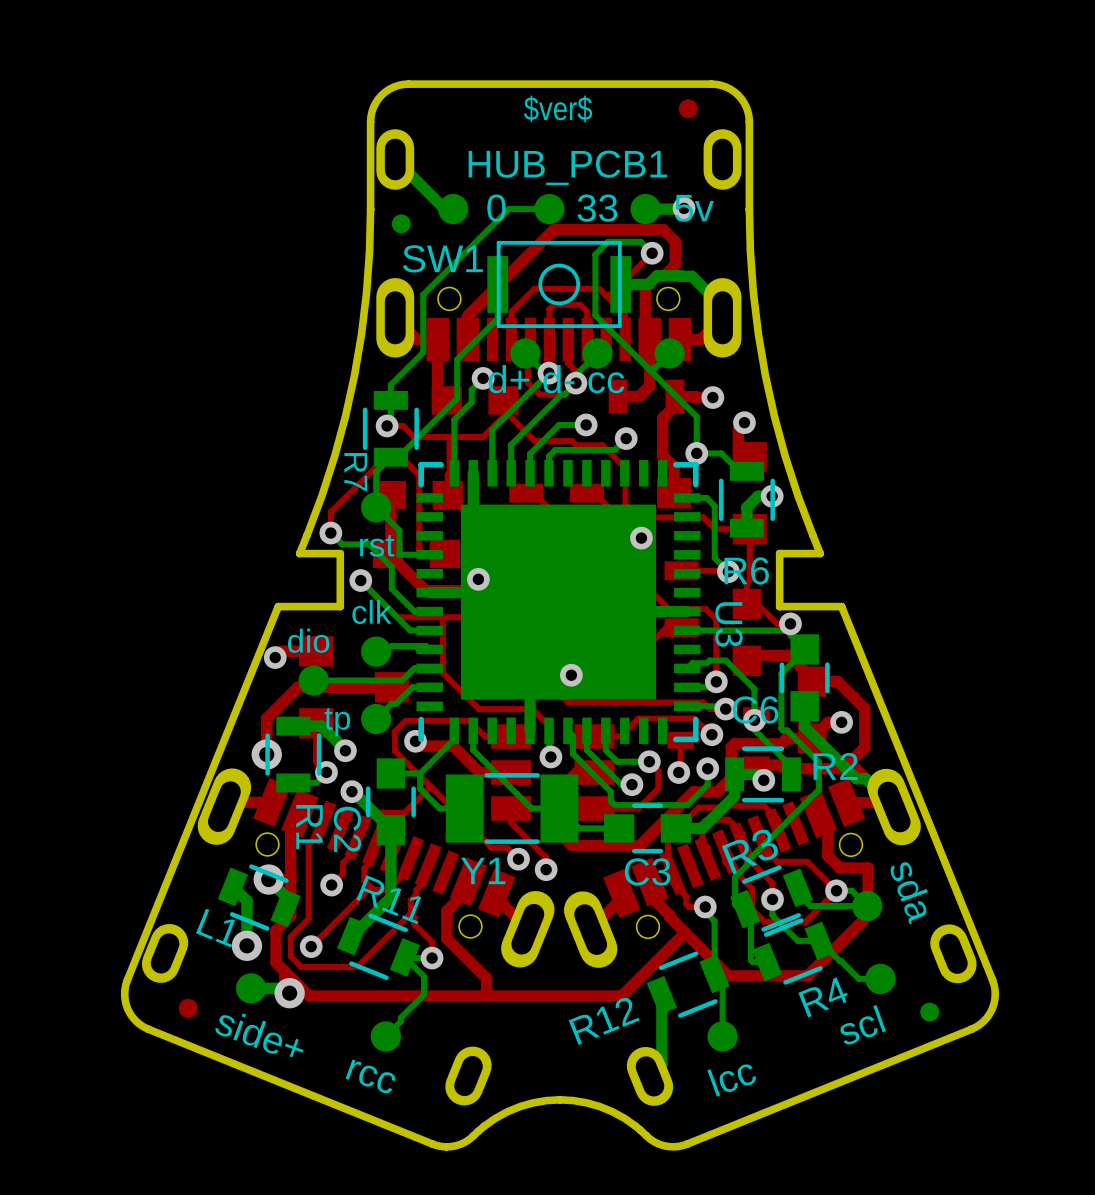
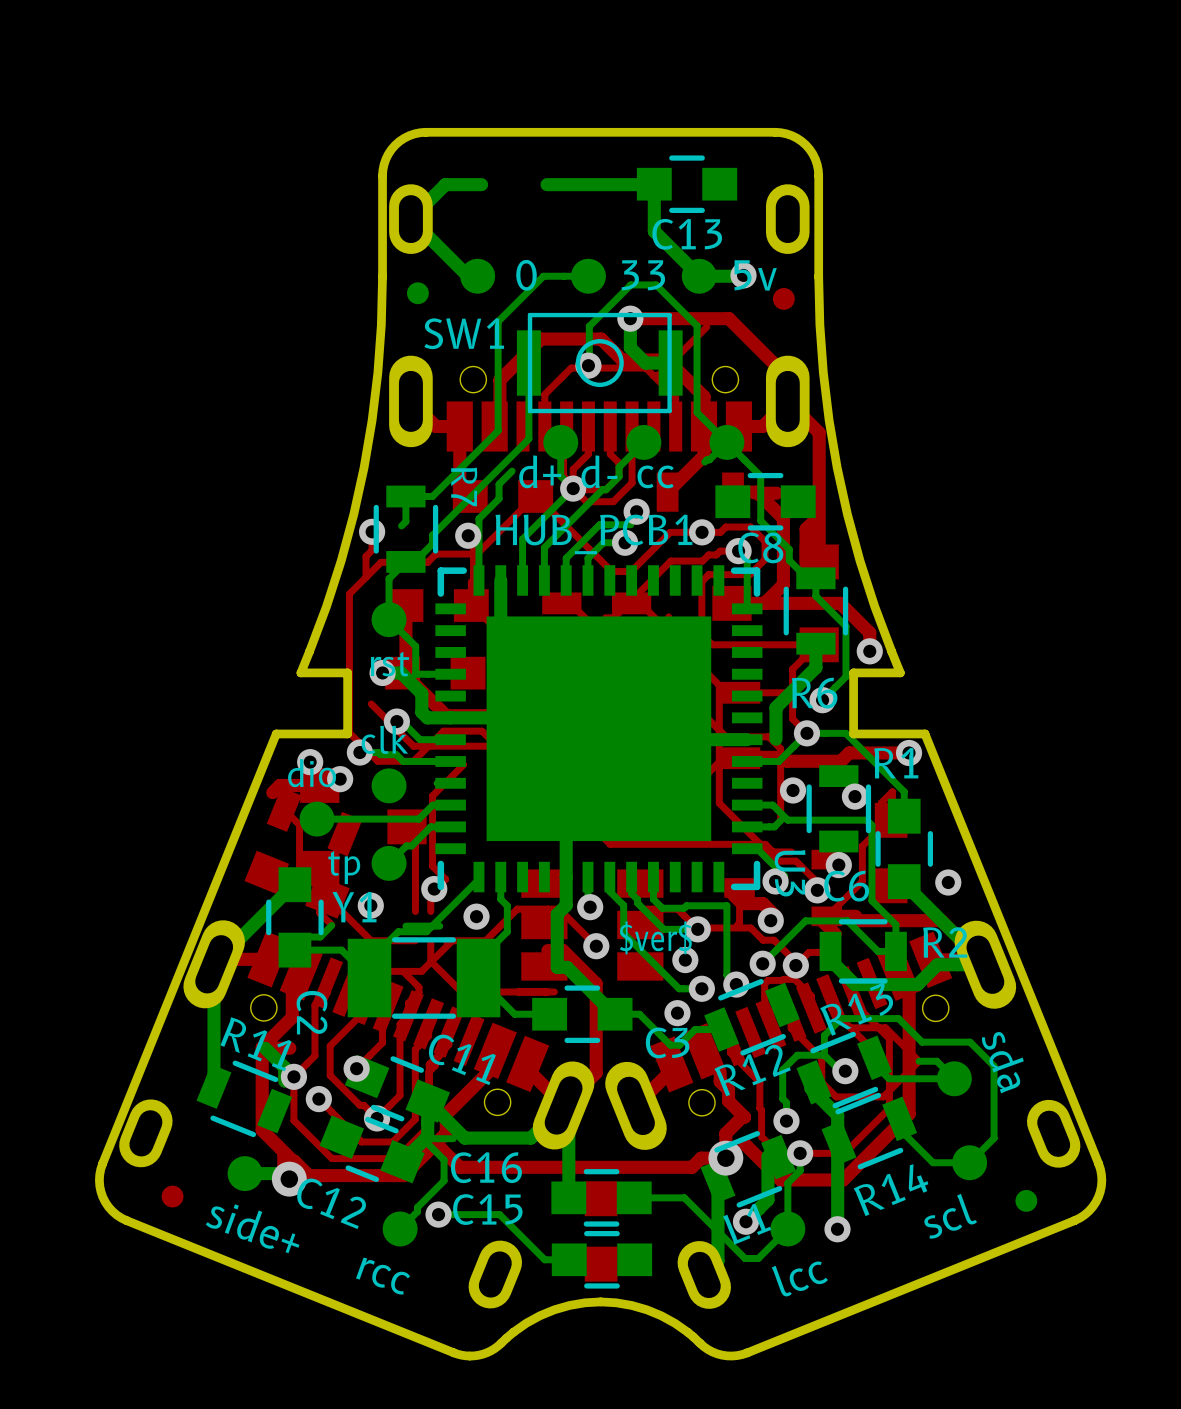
text position: $ver$ (558, 108) -> $ver$ (655, 937)
part position: (688, 108) -> (783, 298)
bottom track: none -> (481, 184) (445, 184) (410, 219)
bottom track: none -> (654, 184) (654, 231) (699, 276)
bottom track: none -> (653, 184) (547, 184)
C13: none -> (687, 184)
text position: HUB_PCB1 (567, 167) -> HUB_PCB1 (593, 534)
bottom track: (510, 209) (423, 294) (423, 352) (390, 384) (390, 400) -> (543, 276) (498, 321) (498, 430) (432, 496) (405, 496)
top track: none -> (630, 318) (729, 318) (787, 377) (787, 401) (819, 432) (819, 561)
via: none -> (630, 318)
bottom track: (652, 253) (640, 241) (608, 241) (595, 254) (595, 315) (696, 416) (696, 453) (721, 453) (723, 455) -> (588, 365) (589, 326) (630, 284) (656, 284) (697, 325) (697, 412) (760, 476) (760, 520) (789, 549) (789, 560)
via: (652, 253) -> none
bottom track: (620, 284) (648, 284) (657, 275) (692, 276) (722, 306) (722, 317) -> (670, 363) (645, 363) (630, 347) (630, 318)
via: none -> (588, 365)
bottom track: (497, 318) (457, 359) (457, 398) (413, 441) -> (528, 402) (528, 438) (432, 535) (432, 544)
top track: (587, 339) (587, 311) (580, 304) (553, 304) (549, 309) (549, 339) -> (632, 426) (632, 482) (613, 501) (586, 501) (573, 488) (573, 469) (588, 454)
top track: (649, 339) (645, 335) (645, 287) (657, 275) (664, 275) (675, 264) (675, 241) (663, 229) (554, 229) (467, 315) (467, 339) -> (704, 426) (704, 396) (667, 359) (622, 359) (601, 339) (540, 339) (499, 380) (499, 421) (494, 426)
bottom track: (525, 353) (545, 373) (548, 373) (492, 429) (492, 437) -> (560, 442) (560, 476) (573, 488) (522, 539)
top track: (649, 364) (649, 385) (638, 396) (618, 396) -> (704, 455) (667, 492)
via position: (548, 373) -> (573, 488)
via: (483, 378) -> none
via: (575, 383) -> none
top track: none -> (758, 493) (783, 518) (783, 584) (764, 603)
via: (712, 397) -> none
top track: (669, 411) (662, 418) (662, 455) (674, 466) (674, 493) -> (869, 651) (869, 632) (840, 603) (731, 603)
top track: (507, 413) (534, 441) (572, 441) (576, 445) (602, 445) (625, 468) (625, 504) (638, 517) (703, 517) (715, 529) -> (533, 745) (495, 745) (482, 731) (443, 731) (413, 761) (377, 761) (349, 732) (349, 593) (381, 562) (427, 562) (436, 554) (477, 554) (534, 496) (536, 496) (611, 571) (631, 571) (670, 532) (720, 532) (725, 527) (750, 527) (765, 541) (765, 559) (749, 574) (708, 574) (701, 581) (701, 634) (712, 644) (779, 644)
top track: (507, 413) (483, 436) (414, 436) (403, 425) (387, 425) -> none
via: none -> (636, 511)
via: (744, 422) -> none
via: (586, 424) -> none
via position: (387, 425) -> (372, 531)
top track: none -> (372, 531) (372, 550) (366, 556) (366, 577)
via: none -> (468, 535)
bottom track: (626, 438) (614, 449) (555, 449) (549, 456) -> (625, 542) (603, 542) (588, 558) (588, 560)
via position: (626, 438) -> (702, 532)
via: none -> (625, 542)
top track: none -> (738, 551) (720, 551) (716, 554) (708, 554) (702, 561) (670, 561) (614, 617) (605, 617)
via position: (696, 453) -> (738, 551)
R7 name position: R7 (355, 471) -> R7 (464, 486)
bottom track: none -> (815, 578) (815, 596) (846, 626) (846, 676) (822, 700)
bottom track: (772, 496) (758, 496) (746, 507) (746, 528) -> (776, 739) (776, 707) (815, 667) (815, 643)
via: (772, 496) -> none
bottom track: (687, 497) (706, 497) (714, 506) (714, 558) (728, 571) -> (747, 608) (747, 559) (738, 551)
top track: none -> (668, 616) (668, 634) (719, 685) (719, 803) (777, 861) (796, 861) (817, 882) (817, 890)
top track: none -> (817, 644) (792, 669) (792, 718) (806, 733)
bottom track: (330, 533) (342, 544) (369, 544) (391, 567) (391, 588) (414, 611) -> (396, 721) (402, 721) (420, 739) (433, 739)
top track: (330, 533) (330, 512) (380, 462) (406, 462) (419, 475) (419, 549) (423, 553) (444, 553) -> none
via: (330, 533) -> none
via: none -> (869, 651)
via: (641, 538) -> none
top track: (738, 540) (749, 529) (749, 579) (746, 582) (746, 603) (757, 603) (777, 623) (790, 623) -> none
bottom track: none -> (382, 672) (401, 672) (421, 693) (421, 712) (427, 717) (450, 717)
via: none -> (382, 672)
via: (728, 571) -> none
via: none -> (822, 700)
via: (478, 579) -> none
bottom track: (360, 580) (410, 630) -> (359, 752) (396, 754) (403, 761) (428, 761)
via position: (360, 580) -> (396, 721)
via: none -> (806, 733)
top track: (442, 617) (442, 673) (478, 709) (532, 709) (550, 727) (550, 757) -> none
via: none -> (359, 752)
via: (790, 623) -> none
top track: none -> (909, 752) (849, 752) (840, 761) (787, 761) (783, 757) (753, 757)
via: none -> (909, 752)
U3 name position: U3 (728, 624) -> U3 (790, 873)
bottom track: (714, 630) (783, 630) (790, 623) (790, 635) (804, 649) (781, 673) (781, 728) (787, 730) (818, 762) (818, 789) (747, 860) (747, 864) (735, 877) (735, 904) (750, 920) (750, 960) (752, 962) (766, 962) -> (778, 761) (806, 733) (845, 733) (904, 791) (904, 816)
via: none -> (310, 762)
C8 side: top (746, 632) -> bottom (765, 501)
top track: none -> (463, 764) (432, 795) (432, 866) (445, 879) (430, 892) (430, 911)
via: none -> (340, 779)
bottom track: (429, 649) (426, 646) (391, 646) (376, 661) -> none
via: none -> (793, 790)
via: (275, 657) -> none
top track: (746, 660) (752, 655) (789, 655) (812, 678) (812, 681) (837, 681) (864, 708) (864, 747) (843, 768) -> none
via: none -> (854, 796)
top track: none -> (881, 803) (892, 791) (892, 816) (862, 846) (862, 881) (823, 920) (817, 920)
bottom track: (687, 668) (692, 663) (725, 660) (754, 689) (754, 729) (791, 766) (791, 774) -> (747, 805) (772, 805) (787, 820) (866, 820) (871, 825) (871, 900) (895, 924) (895, 951) (878, 951) (847, 920) (805, 920) (762, 963)
top track: none -> (284, 809) (299, 824) (299, 869) (371, 940) (415, 940)
via: (571, 675) -> none
C6 position: (804, 677) -> (904, 848)
via: (716, 681) -> none
part: none -> (314, 821)
top track: none -> (395, 823) (413, 823) (415, 825) (415, 911)
top track: (391, 687) (297, 687) (266, 718) (266, 754) -> none
bottom track: (695, 706) (722, 706) (725, 709) -> (757, 848) (784, 876) (784, 884)
bottom track: (804, 706) (804, 727) (856, 778) (865, 778) -> (904, 881) (952, 932)
via: (725, 709) -> none
via: (754, 720) -> none
via: none -> (838, 865)
top track: (841, 722) (828, 722) (812, 738) (786, 738) (781, 743) (734, 743) (731, 747) (731, 777) (717, 791) (693, 791) (640, 845) (571, 845) (557, 831) (557, 791) (576, 772) (594, 772) -> none
via position: (841, 722) -> (948, 882)
bottom track: (293, 726) (321, 726) (345, 750) -> none
bottom track: none -> (566, 877) (566, 905) (557, 914) (557, 967) (567, 967) (613, 1014) (639, 1014) (670, 1045) (679, 1045) (695, 1029) (721, 1029)
bottom track: (567, 730) (573, 735) (573, 753) (610, 791) (610, 801) (614, 805) (687, 805) (707, 784) (707, 768) -> (609, 877) (609, 891) (623, 905) (623, 933) (679, 988) (701, 988)
bottom track: (454, 732) (454, 739) (420, 773) (420, 789) (439, 808) (464, 808) -> (478, 879) (426, 931) (398, 931) (369, 960) (369, 978) (341, 950) (294, 950)
top track: (711, 734) (693, 718) (638, 718) (620, 736) (594, 736) -> none
top track: (511, 736) (485, 736) (469, 720) (405, 720) (395, 731) (395, 751) (491, 847) (507, 847) (518, 859) -> none
bottom track: none -> (294, 884) (213, 964) (213, 1086)
part: none -> (297, 884)
top track: (415, 741) (420, 746) (453, 746) (479, 772) (511, 772) -> none
via: none -> (817, 890)
top track: none -> (730, 892) (742, 903) (762, 903) (776, 916)
bottom track: (586, 745) (586, 750) (621, 784) (631, 784) -> (631, 893) (637, 899) (637, 903) (663, 929) (697, 929)
via position: (345, 750) -> (370, 905)
via: (266, 754) -> none
R1 position: (293, 754) -> (838, 808)
bottom track: (478, 755) (531, 808) (559, 808) (579, 828) (619, 828) -> (507, 905) (507, 931) (478, 960) (478, 978) (514, 1014) (549, 1014)
bottom track: (613, 757) (617, 761) (649, 761) -> (662, 908) (684, 908) (686, 905) (726, 905) (726, 975) (736, 984)
top track: (649, 761) (658, 770) (658, 788) (638, 808) (594, 808) -> none
via: (649, 761) -> none
via: none -> (476, 916)
via: (326, 772) -> none
via: (678, 772) -> none
R2 position: (763, 774) -> (863, 951)
via: none -> (697, 929)
bottom track: (763, 780) (757, 774) (734, 774) (734, 796) (702, 828) (675, 828) (686, 820) -> none
via: (763, 780) -> none
via: (631, 784) -> none
top track: none -> (430, 940) (430, 961) (461, 991) (554, 991)
top track: none -> (446, 940) (485, 940) (517, 909) (559, 909) (596, 946)
via: none -> (596, 946)
bottom track: (351, 791) (390, 829) (390, 897) (352, 936) -> none
via: (351, 791) -> none
top track: none -> (547, 950) (563, 950) (596, 983) (596, 1072) (563, 1105)
bottom track: none -> (830, 951) (830, 960) (854, 984) (917, 984) (937, 964) (985, 964)
C2 position: (390, 801) -> (294, 917)
via: none -> (685, 960)
via: none -> (762, 963)
via: none -> (795, 965)
top track: (511, 808) (511, 822) (546, 857) (546, 869) -> none
Y1 position: (512, 808) -> (424, 978)
top track: (292, 821) (290, 823) (290, 916) (275, 930) (275, 962) (309, 996) (621, 996) (685, 932) -> (292, 981) (292, 1017) (262, 1047) (262, 1130) (308, 1175) (403, 1175) (446, 1133) (446, 1114) (495, 1065) (495, 1059)
top track: none -> (327, 983) (327, 992) (314, 1005) (314, 1055) (293, 1076) (293, 1120) (331, 1158) (396, 1158) (429, 1126) (429, 1064) (448, 1044) (448, 1032)
top track: (778, 822) (778, 819) (763, 805) (698, 807) (667, 838) (667, 867) (672, 872) -> (851, 982) (821, 952) (808, 952) (795, 965) (795, 962) (774, 940) (763, 940) (750, 927) (697, 929) (677, 909) (643, 909)
via: none -> (736, 984)
R1 name rotation: 0° (309, 827) -> 90° counterclockwise (896, 763)
R1 name position: R1 (309, 827) -> R1 (896, 763)
via: none -> (701, 988)
C3 position: (647, 828) -> (582, 1014)
C2 name position: C2 (347, 829) -> C2 (311, 1012)
top track: (314, 839) (308, 844) (308, 918) (290, 936) (290, 956) (301, 967) (357, 967) (410, 913) (414, 917) (414, 924) (432, 942) (432, 958) -> none
top track: (357, 844) (357, 848) (343, 863) (343, 873) (331, 885) -> (367, 1008) (330, 1045) (330, 1075) (359, 1105) (363, 1105) (377, 1118) (400, 1095) (400, 1024) (408, 1015)
via: none -> (677, 1013)
R3 name: R3 (750, 851) -> R13 (856, 1009)
R12: none -> (752, 1017)
top track: (827, 855) (839, 867) (868, 867) (868, 915) (807, 975) (728, 975) (649, 895) (649, 882) -> (909, 1021) (909, 1114) (843, 1179) (780, 1179) (744, 1143)
via: (518, 859) -> none
top track: (747, 860) (772, 883) (772, 899) -> none
top track: (370, 862) (364, 868) (364, 880) (373, 889) -> (382, 1026) (382, 1042) (356, 1068)
top track: (410, 867) (388, 889) (367, 889) (311, 946) -> (428, 1034) (415, 1049) (415, 1119) (392, 1141) (361, 1141) (318, 1099)
via: (546, 869) -> none
Y1 name position: Y1 (483, 870) -> Y1 (354, 907)
C3 name position: C3 (647, 871) -> C3 (667, 1042)
via position: (268, 879) -> (293, 1076)
top track: (672, 883) (686, 896) (686, 904) (689, 907) (705, 907) -> (730, 1052) (759, 1082) (761, 1136) (778, 1153) (844, 1153) (889, 1108) (889, 1038) (851, 1001) (851, 991)
via position: (331, 885) -> (356, 1068)
bottom track: none -> (824, 1055) (797, 1055) (782, 1069) (782, 1098) (786, 1102) (786, 1121)
bottom track: none -> (824, 1055) (836, 1066)
bottom track: none -> (824, 1055) (824, 1035) (841, 1018) (898, 1018) (922, 1042) (970, 1042) (994, 1066) (994, 1138) (969, 1162)
bottom track: (232, 886) (246, 900) (246, 945) -> none
top track: (468, 889) (446, 910) (446, 938) (486, 978) (486, 996) -> none
via: (836, 890) -> none
L1: (259, 897) -> none
bottom track: (772, 899) (772, 915) (797, 940) (819, 940) (859, 978) -> (898, 1128) (933, 1162) (944, 1162)
top track: none -> (720, 1071) (720, 1081) (728, 1089) (728, 1101) (744, 1117) (742, 1117) (725, 1133) (725, 1158) (701, 1158) (692, 1167) (459, 1167) (439, 1147) (432, 1147)
bottom track: (705, 907) (705, 911) (714, 921) (714, 974) (722, 982) (722, 996) -> (800, 1153) (800, 1170) (787, 1183)
via: (705, 907) -> none
C11: none -> (397, 1088)
bottom track: none -> (810, 1088) (837, 1115) (837, 1229)
via: none -> (318, 1099)
via: none -> (377, 1118)
via: none -> (786, 1121)
via: (246, 945) -> none
via: (311, 946) -> none
R11 position: (378, 946) -> (244, 1098)
via: (432, 958) -> none
C12: none -> (372, 1149)
via: none -> (800, 1153)
bottom track: none -> (767, 1156) (767, 1199) (745, 1221)
via: none -> (725, 1158)
bottom track: none -> (402, 1161) (427, 1136) (427, 1101) (464, 1138) (531, 1138) (563, 1105) (568, 1110) (568, 1197)
R4 name: R4 (823, 997) -> R14 (891, 1190)
C16: none -> (601, 1197)
bottom track: none -> (634, 1197) (684, 1197) (745, 1258) (758, 1258) (787, 1229)
R12 name: R12 (604, 1021) -> L1 (747, 1224)
bottom track: none -> (438, 1214) (499, 1214) (544, 1259) (569, 1259)
via: none -> (438, 1214)
via: none -> (745, 1221)
via: none -> (837, 1229)
part: none -> (601, 1231)
C15: none -> (601, 1259)

